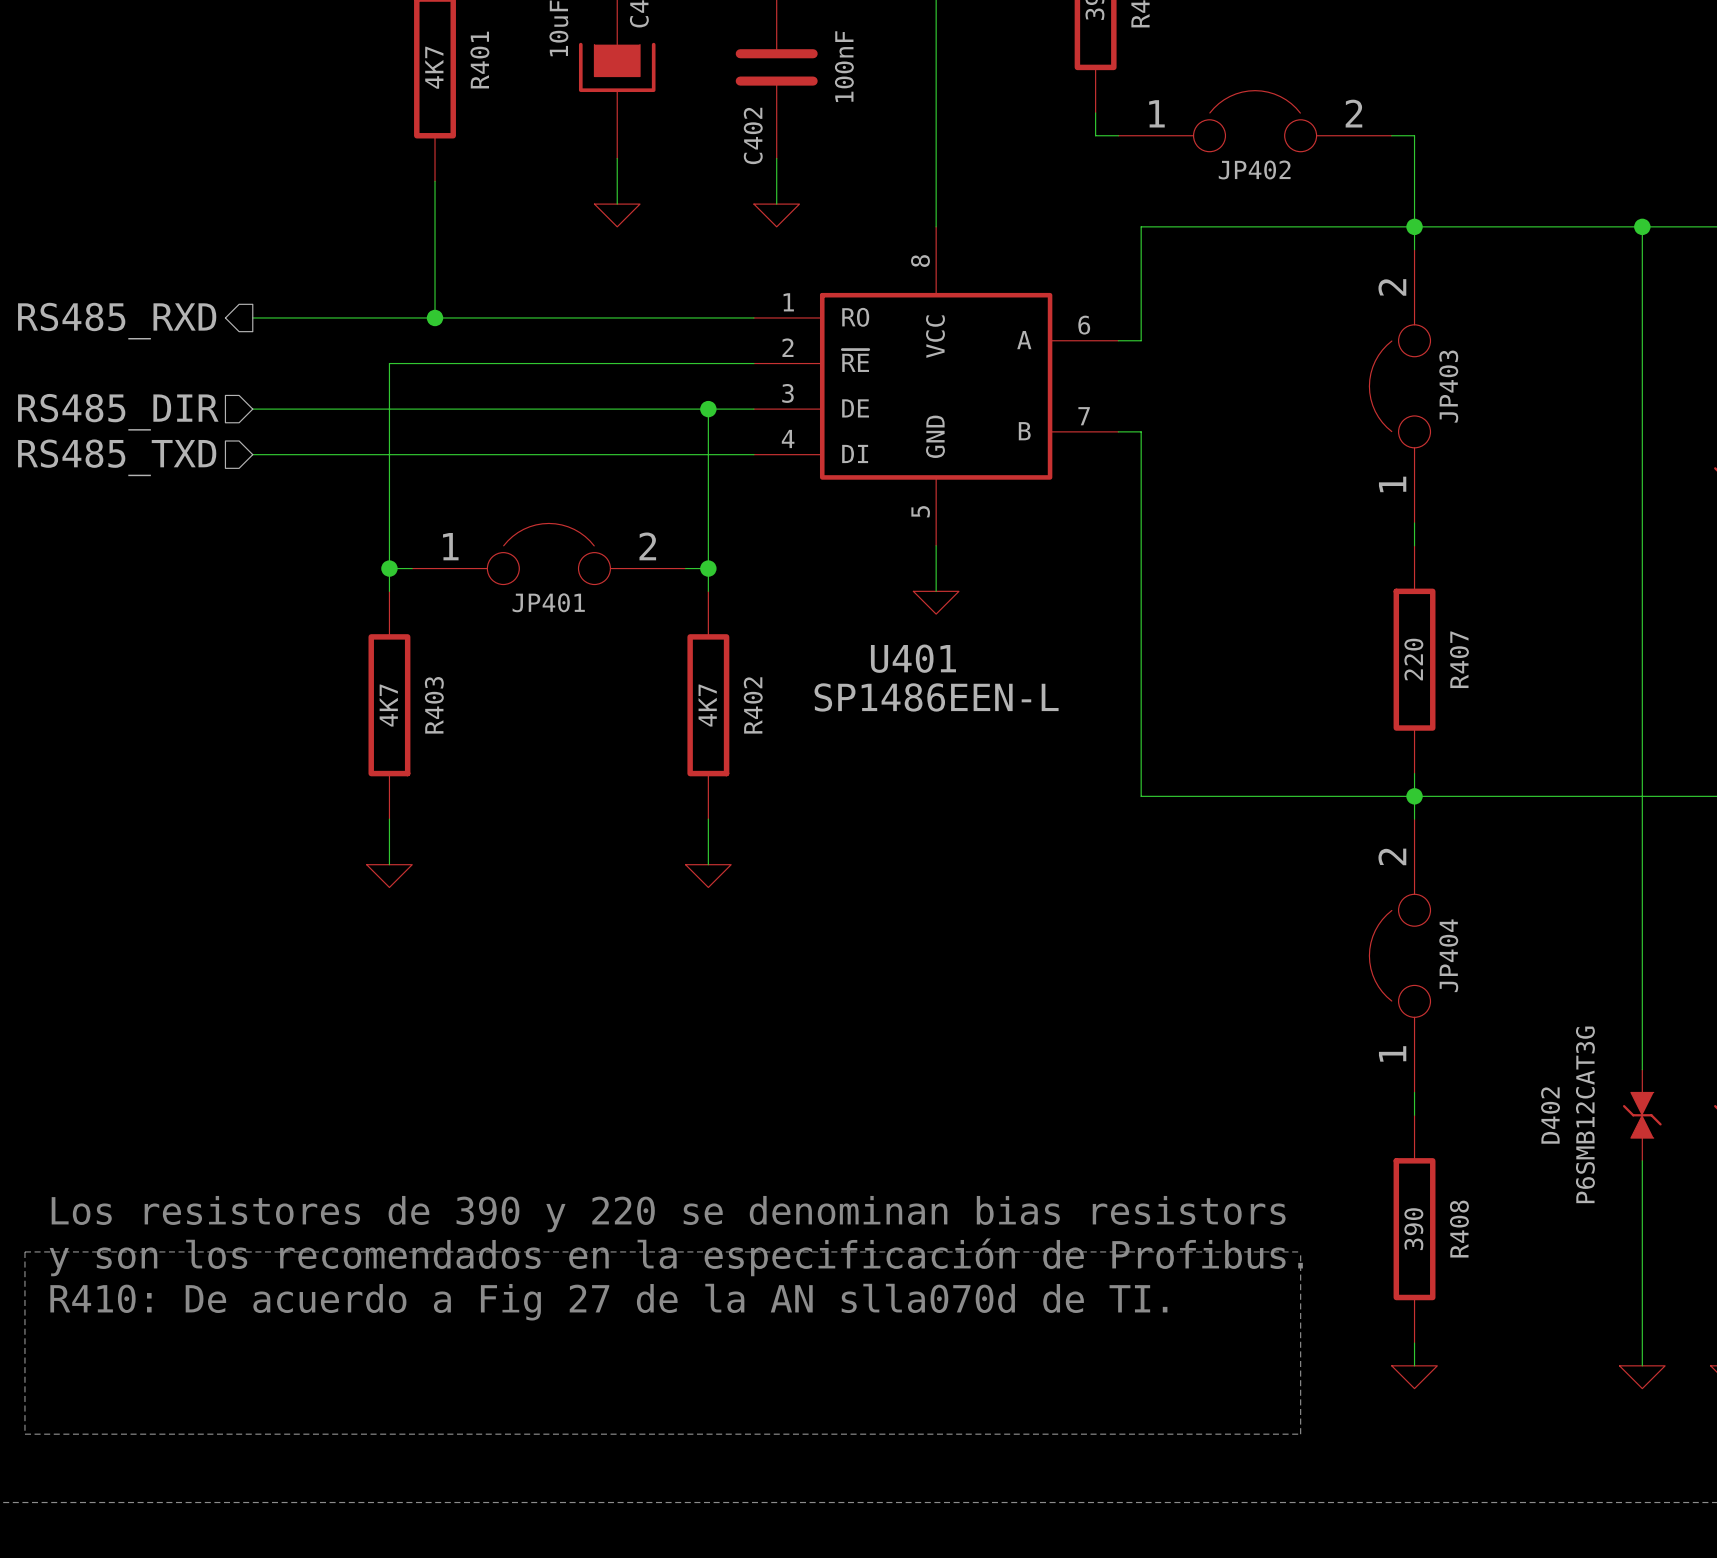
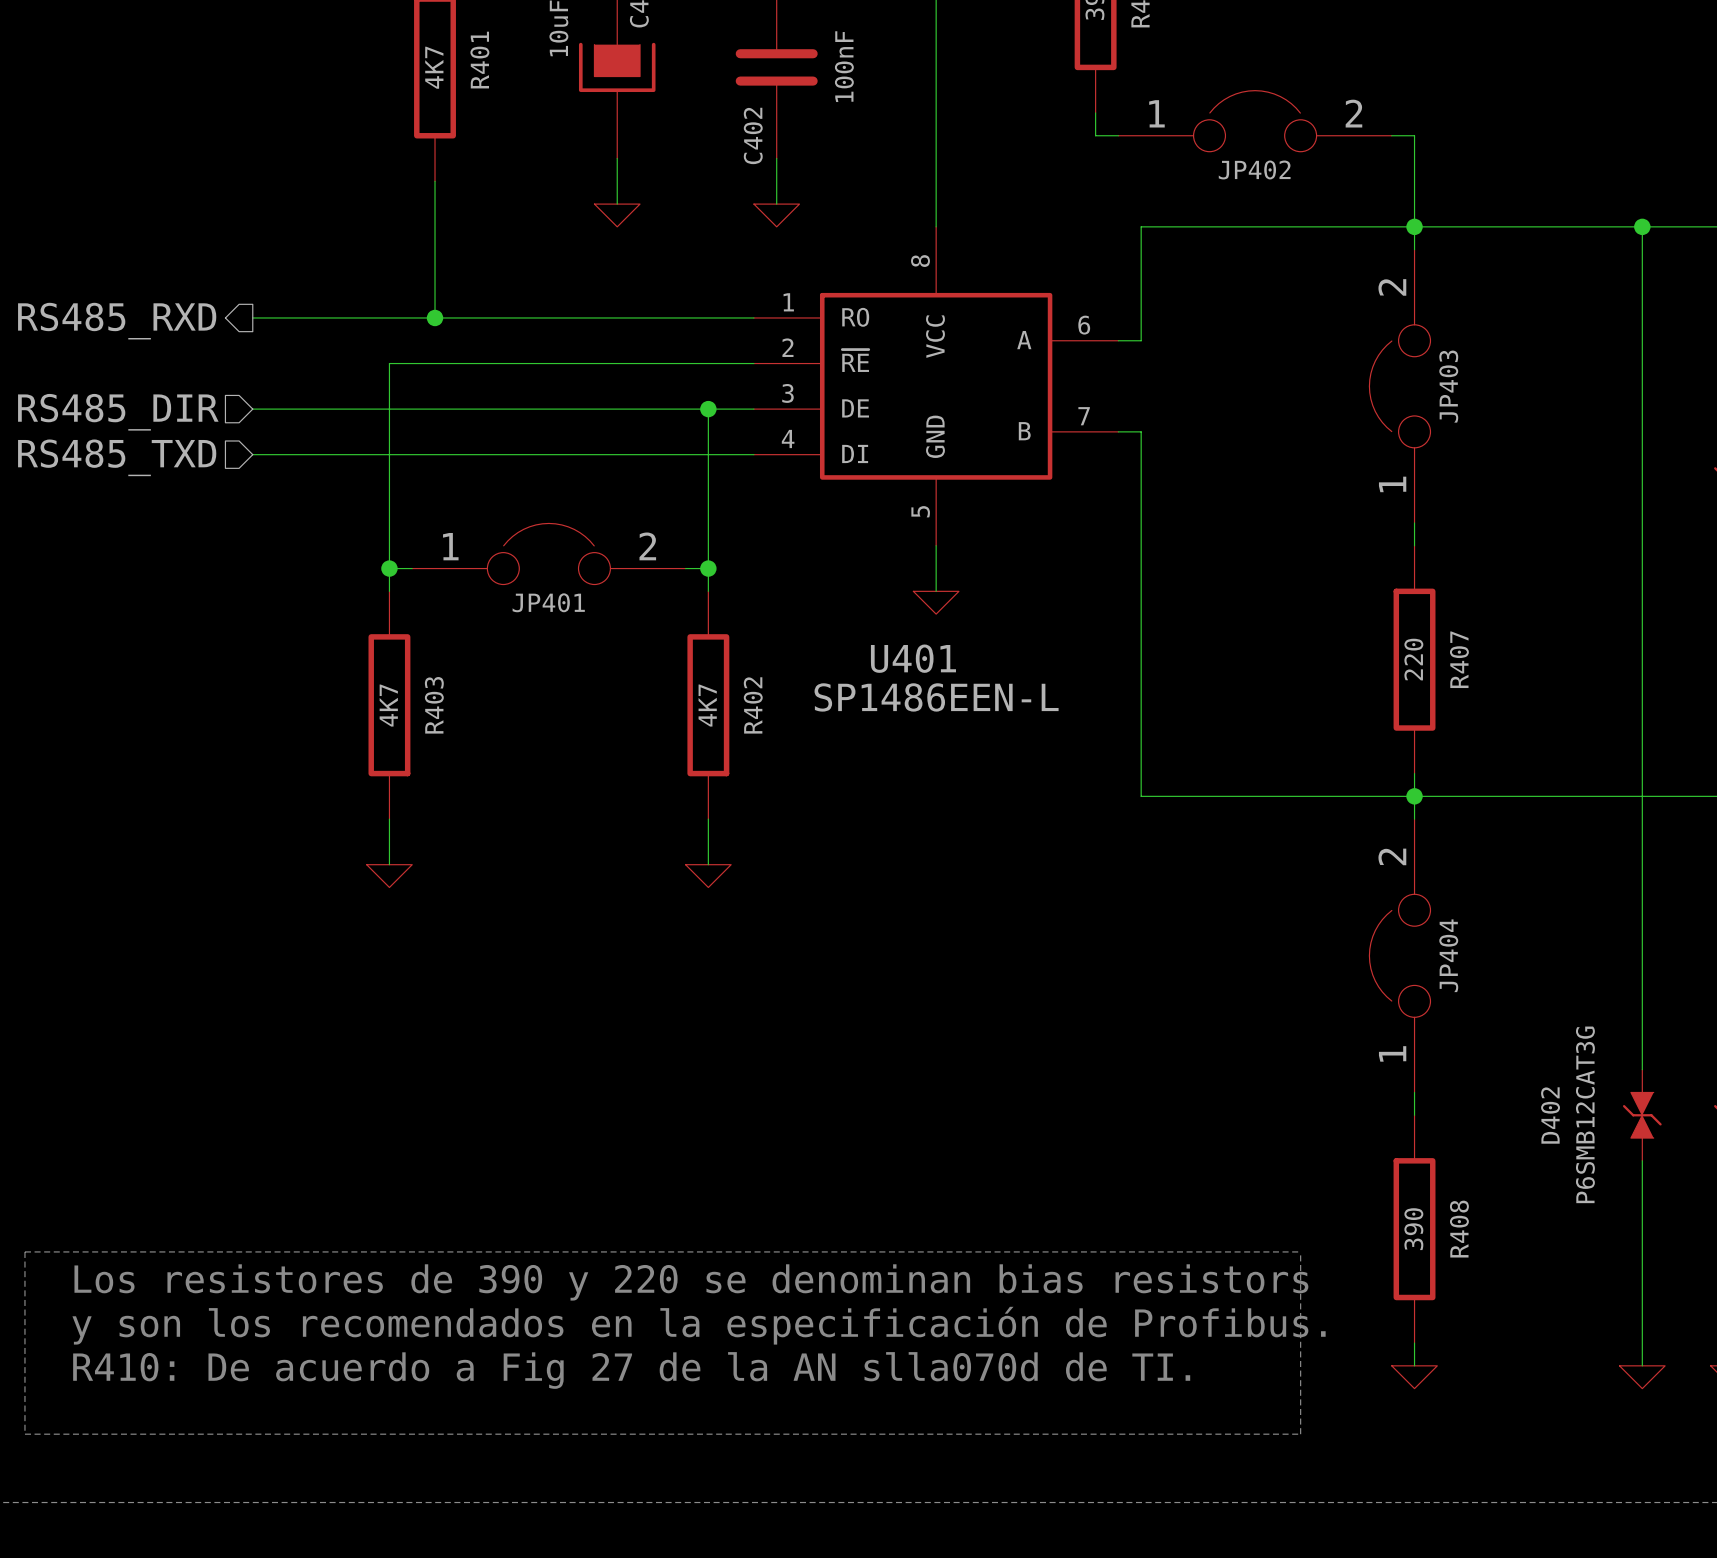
text position: Los resistores de 390 y 220 se denominan bias resistors (668, 1214) -> Los resistores de 390 y 220 se denominan bias resistors (691, 1282)
text position: y son los recomendados en la especificación de Profibus. (676, 1257) -> y son los recomendados en la especificación de Profibus. (699, 1325)
text position: R410: De acuerdo a Fig 27 de la AN slla070d de TI. (608, 1302) -> R410: De acuerdo a Fig 27 de la AN slla070d de TI. (631, 1370)

